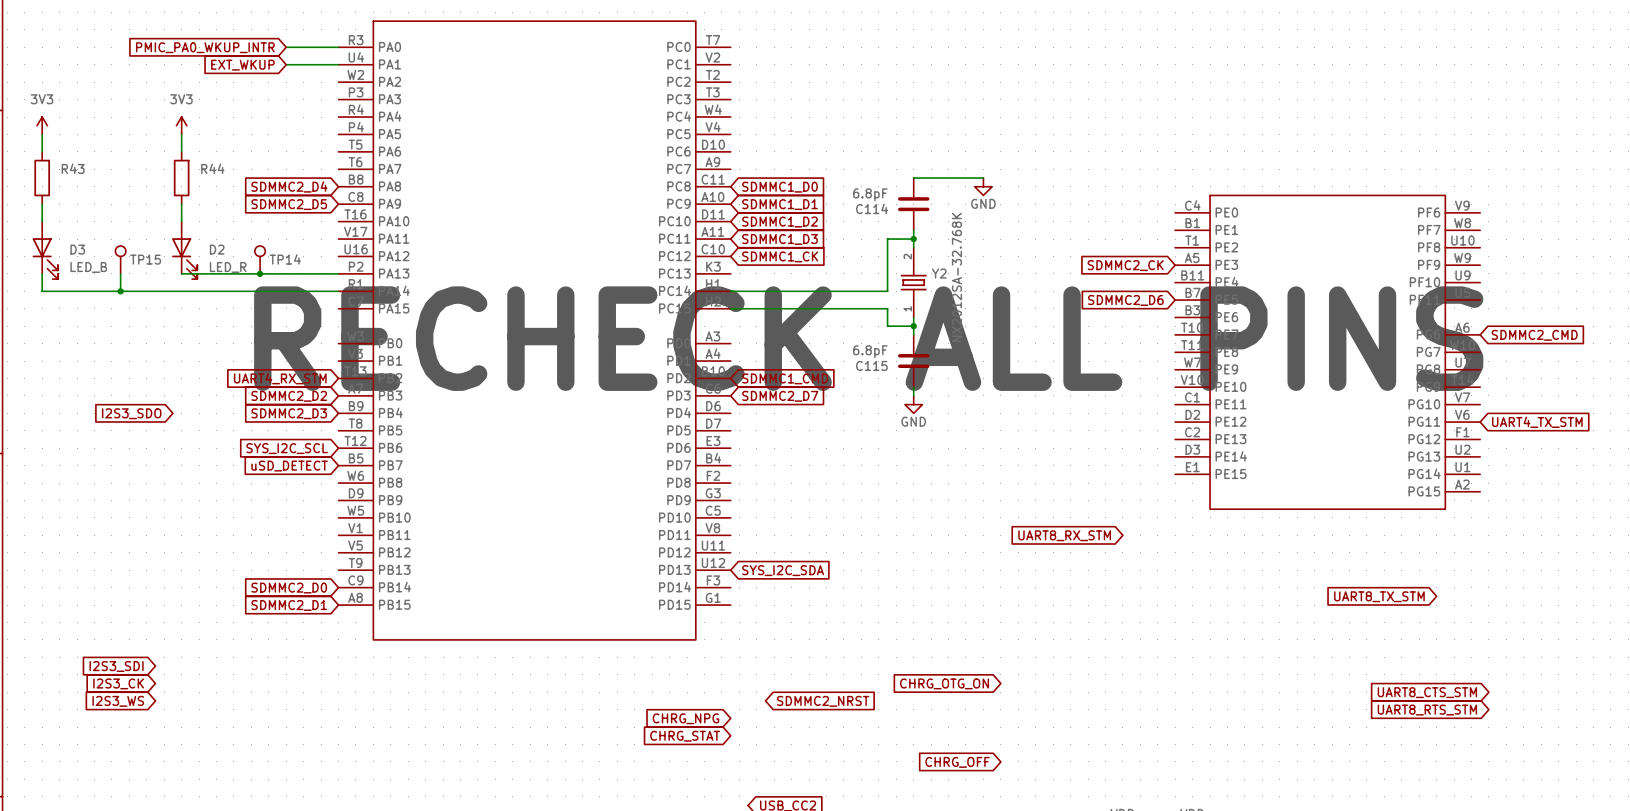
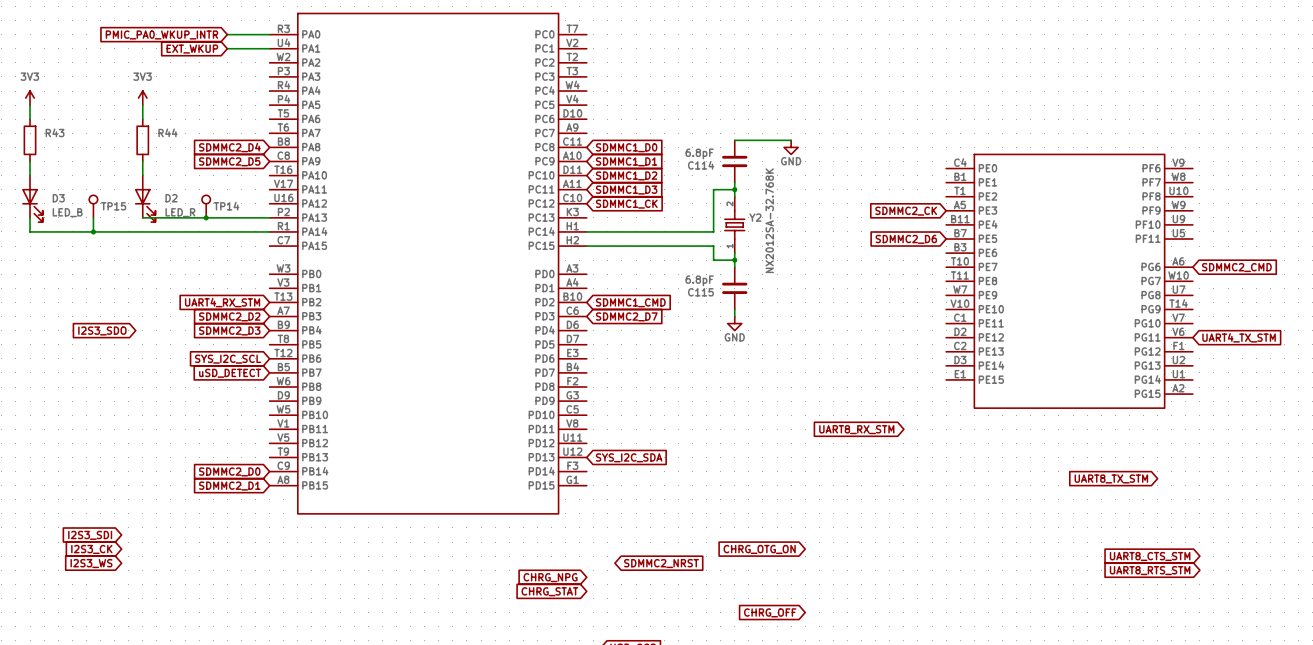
text: RECHECK ALL PINS (868, 338) -> none

